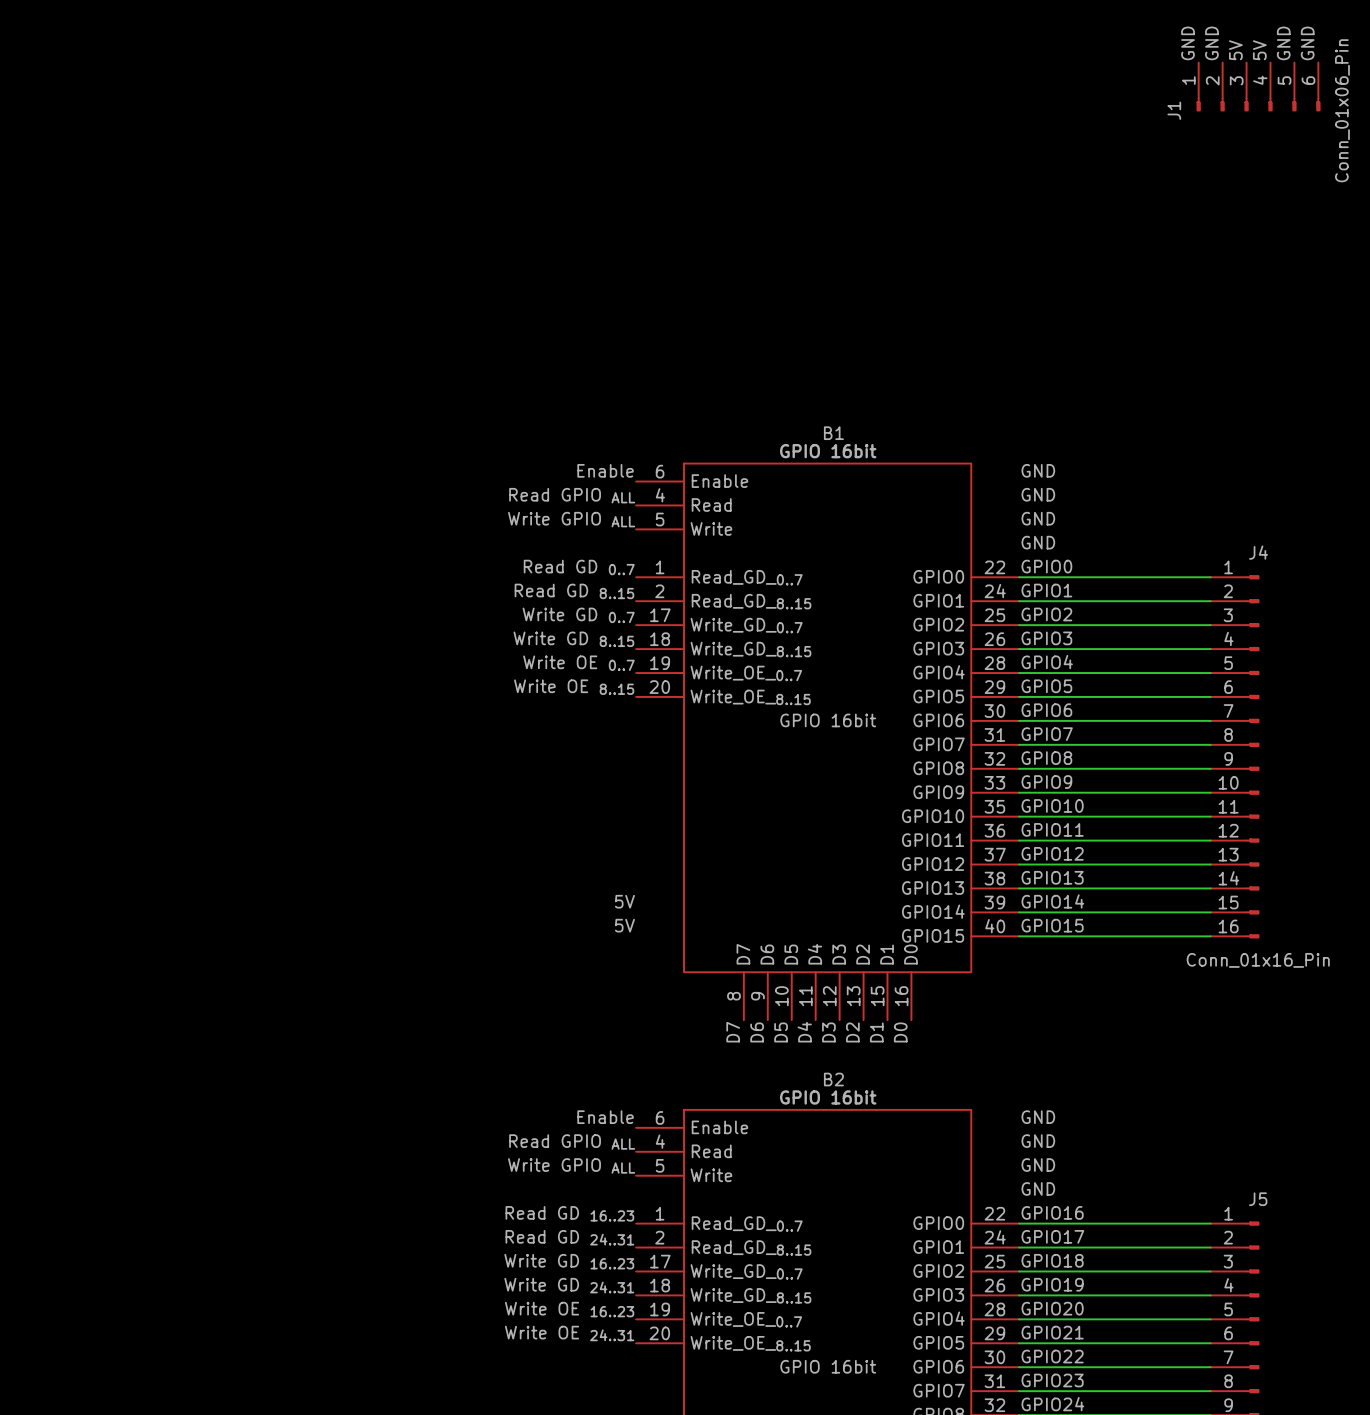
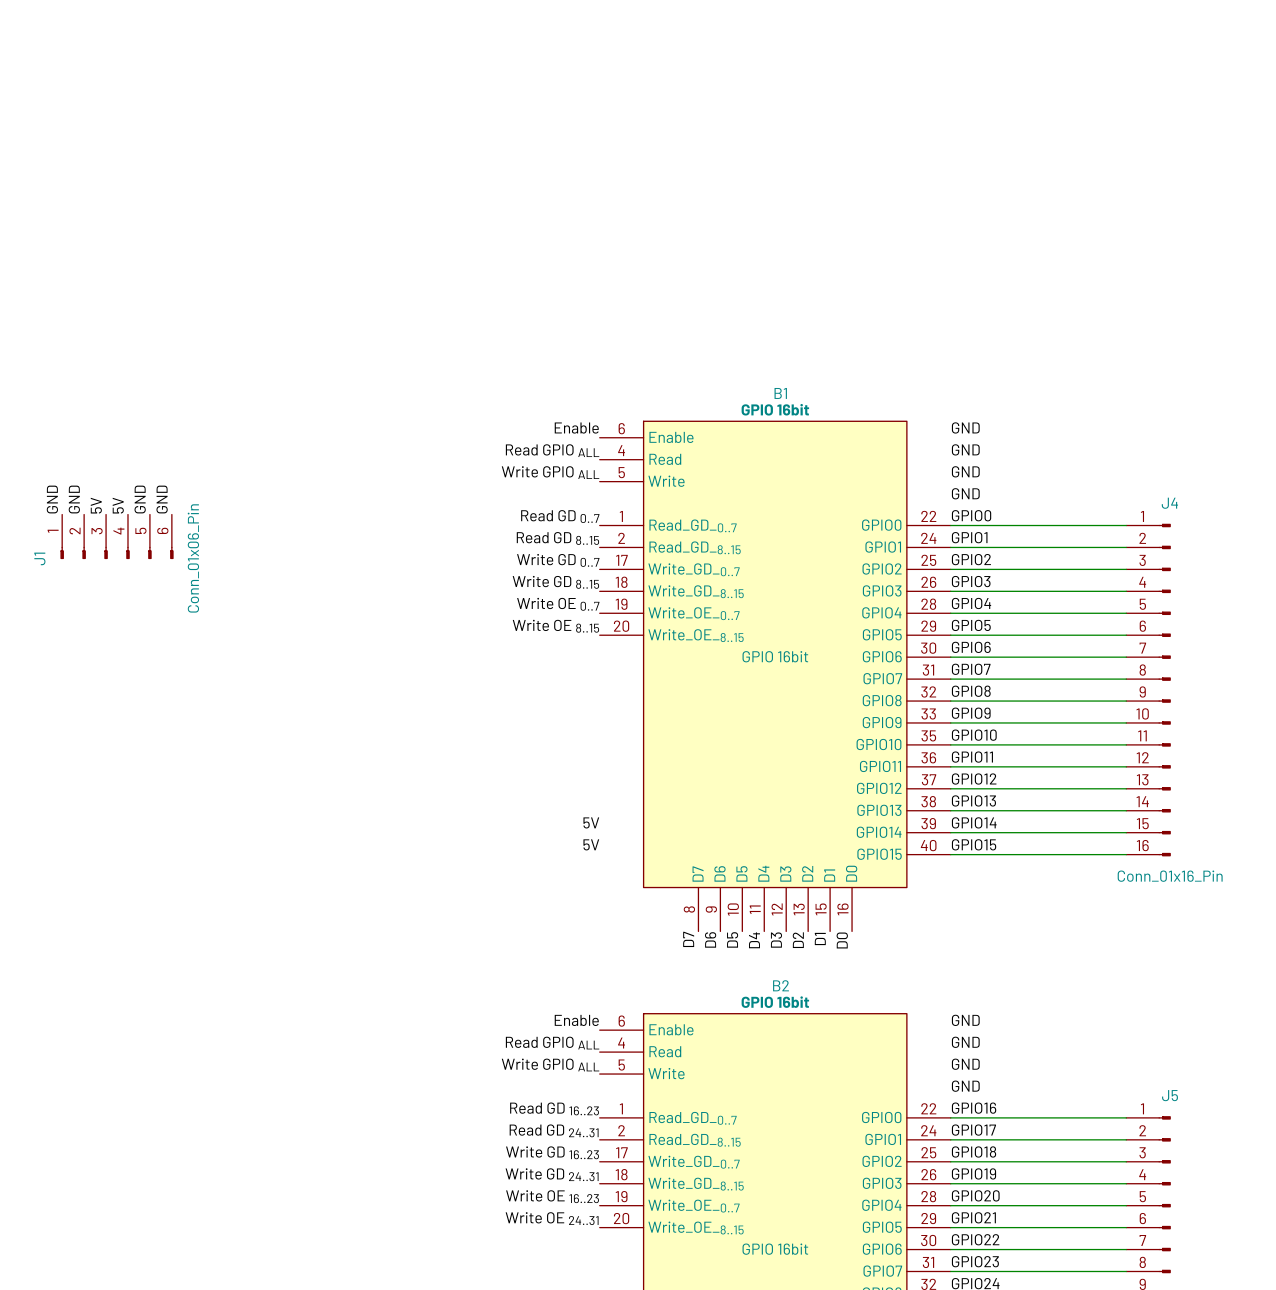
label: GND (1188, 43) -> none
label: GND (1211, 43) -> none
label: GND (1283, 43) -> none
label: GND (1307, 43) -> none
label: 5V (1235, 50) -> none
label: 5V (1259, 50) -> none
J1 position: (1258, 86) -> (117, 536)
label: none -> GND (52, 499)
label: none -> GND (74, 499)
label: none -> GND (140, 499)
label: none -> GND (162, 499)
label: none -> 5V (96, 505)
label: none -> 5V (118, 505)

